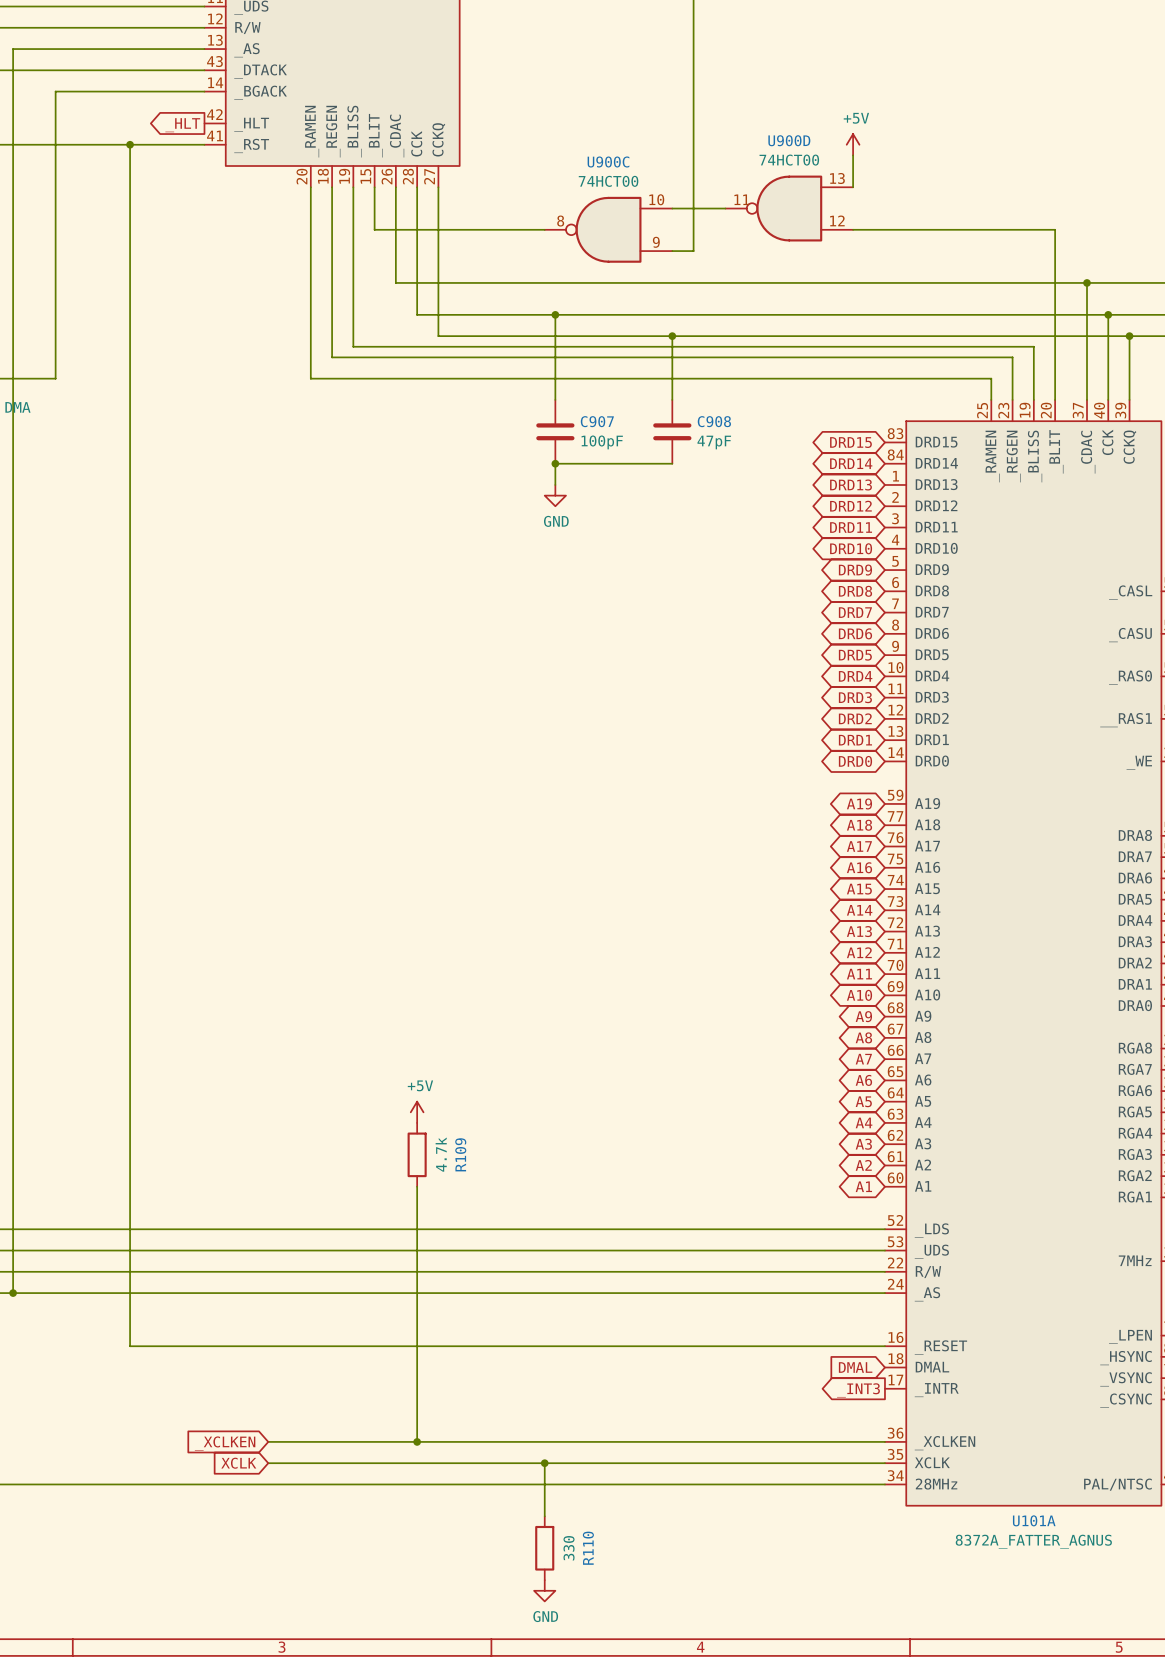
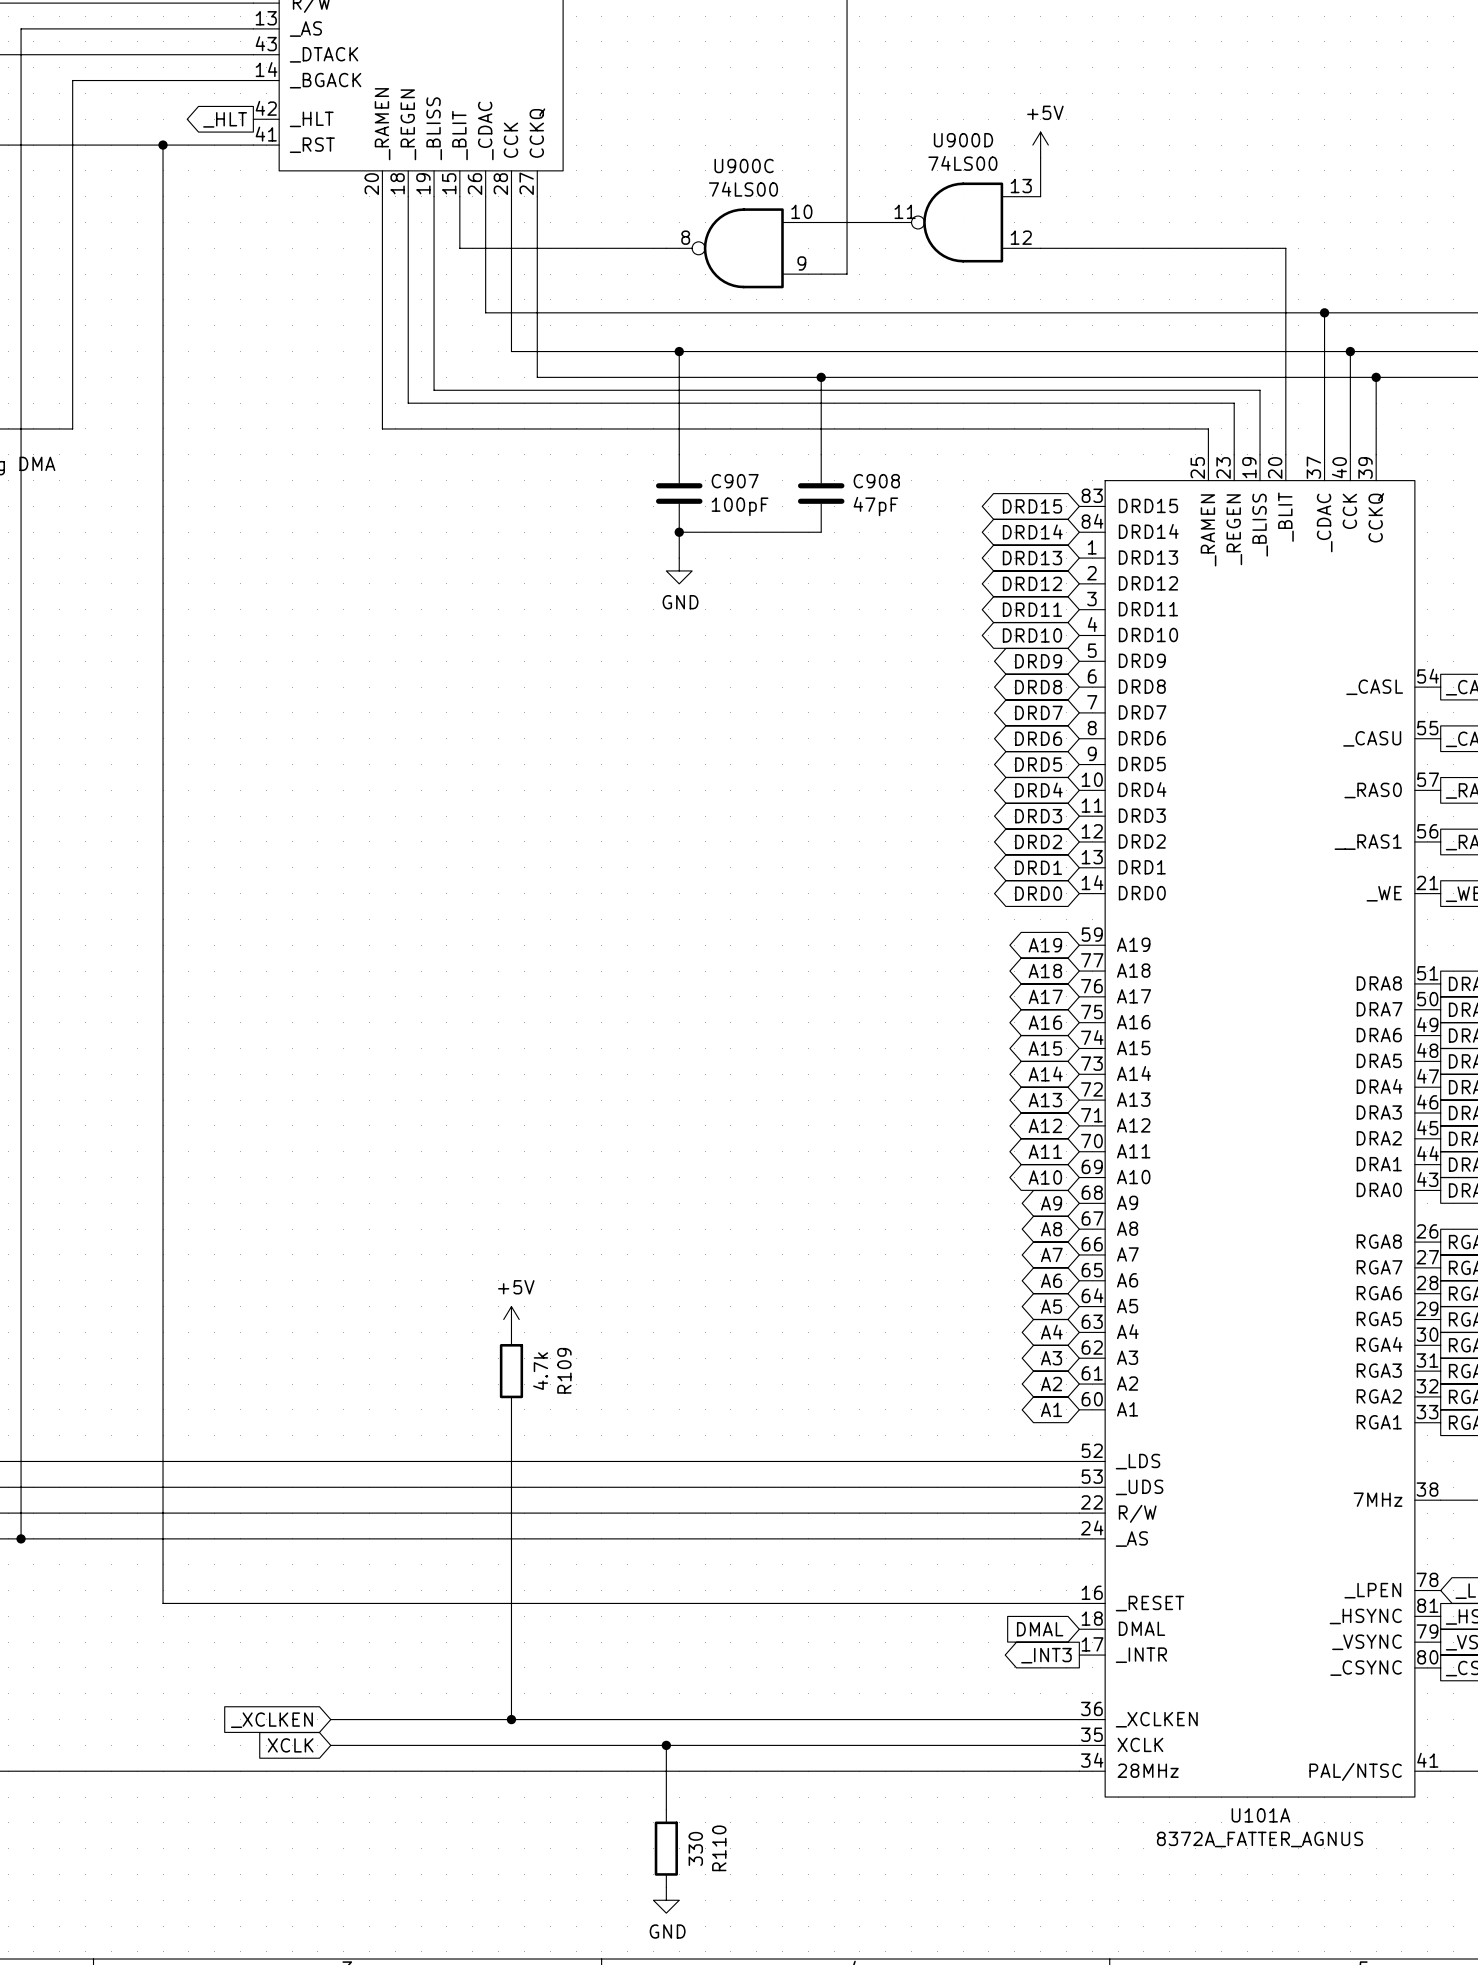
U900D value: 74HCT00 (789, 160) -> 74LS00 (962, 163)
U900C value: 74HCT00 (608, 181) -> 74LS00 (743, 189)

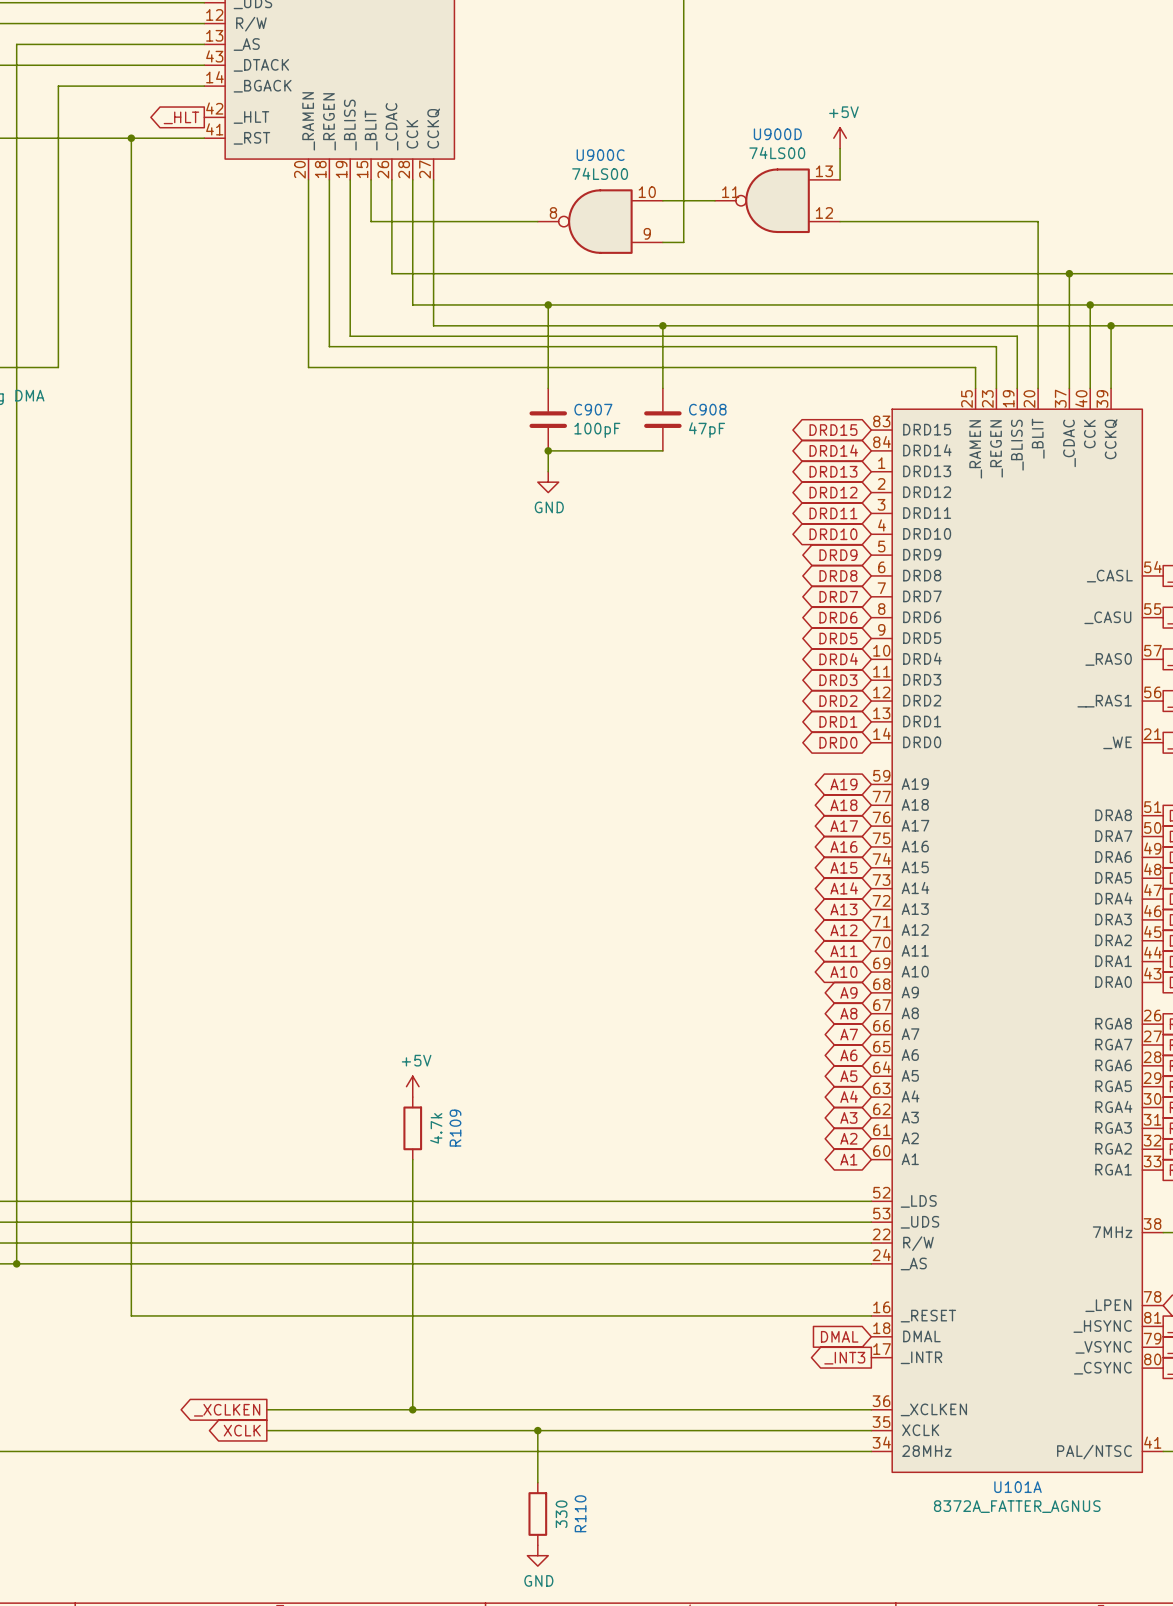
global label shape: input (271, 1720) -> output (227, 1410)
global label shape: input (290, 1745) -> output (242, 1430)

